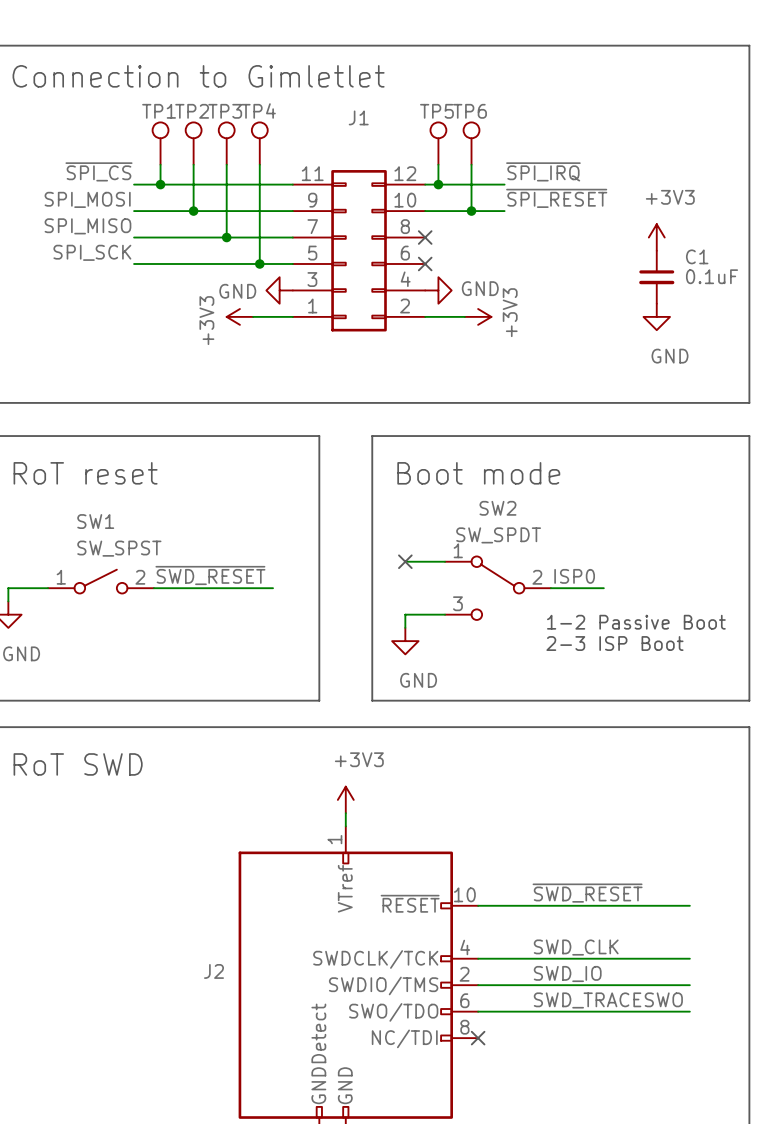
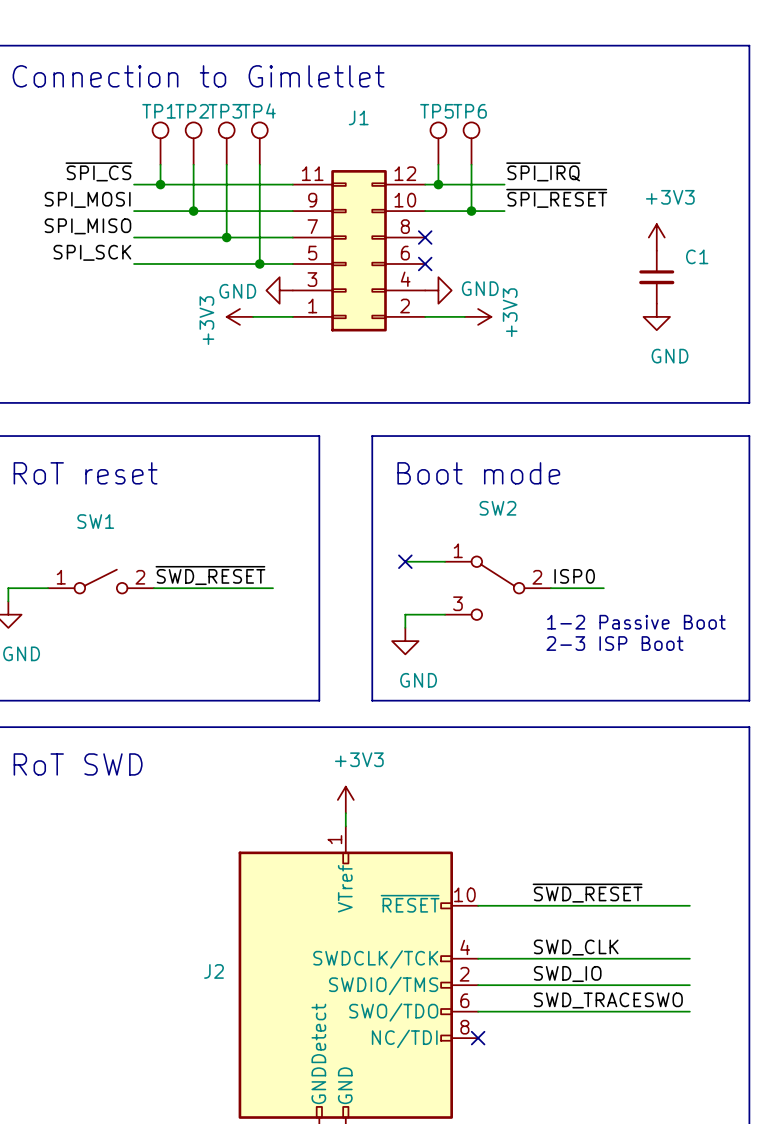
C1 value: 0.1uF (712, 276) -> none
SW2 value: SW_SPDT (498, 535) -> none
SW1 value: SW_SPST (119, 548) -> none

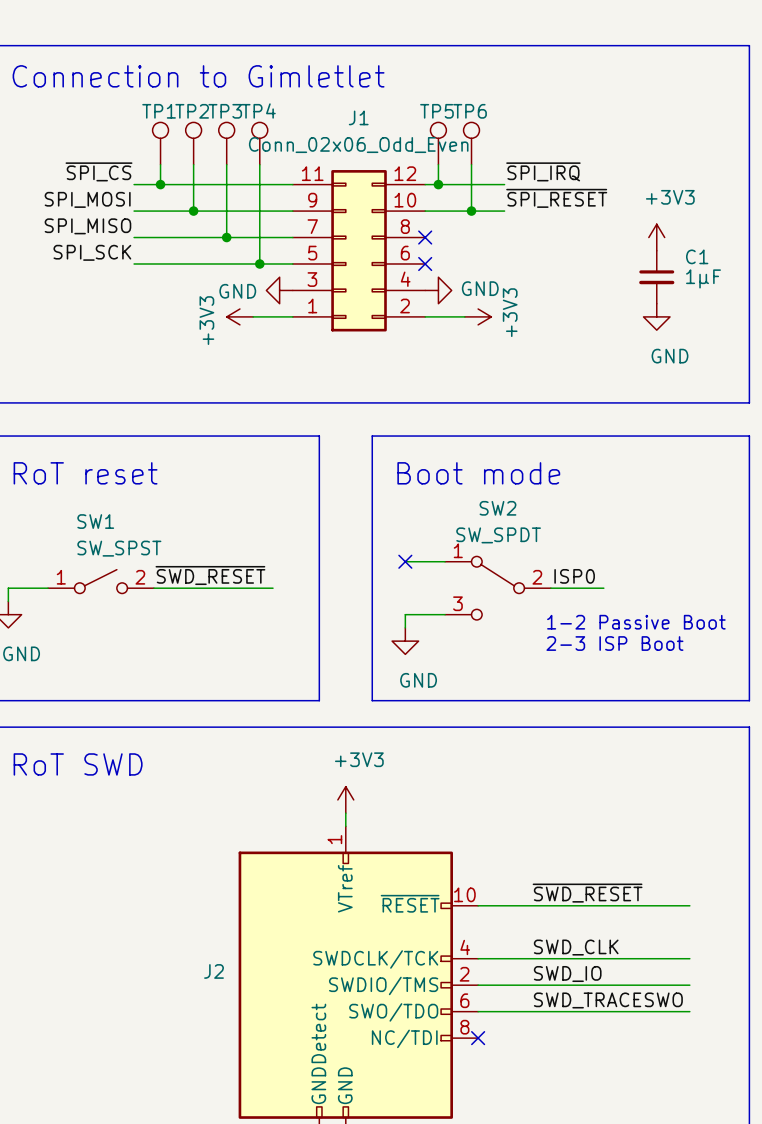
J1 value: none -> Conn_02x06_Odd_Even (358, 145)
C1 value: none -> 1µF (703, 278)
SW2 value: none -> SW_SPDT (498, 535)
SW1 value: none -> SW_SPST (119, 548)

